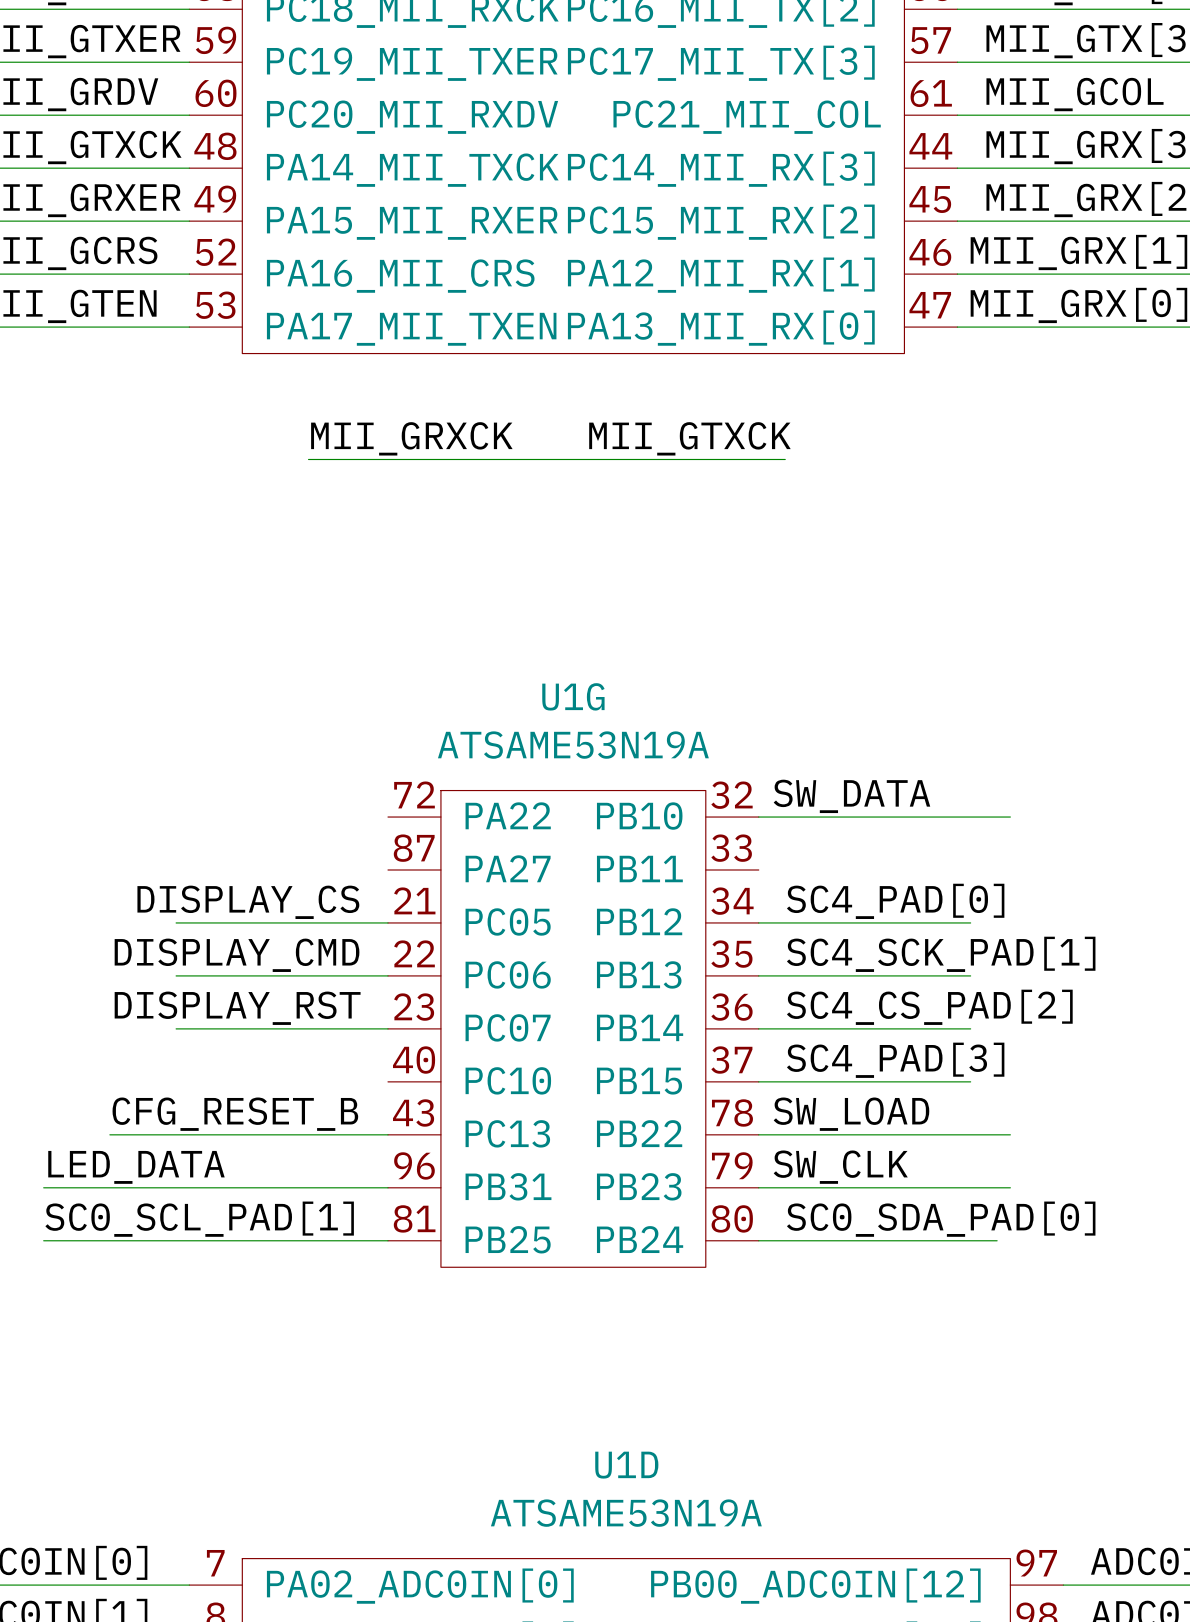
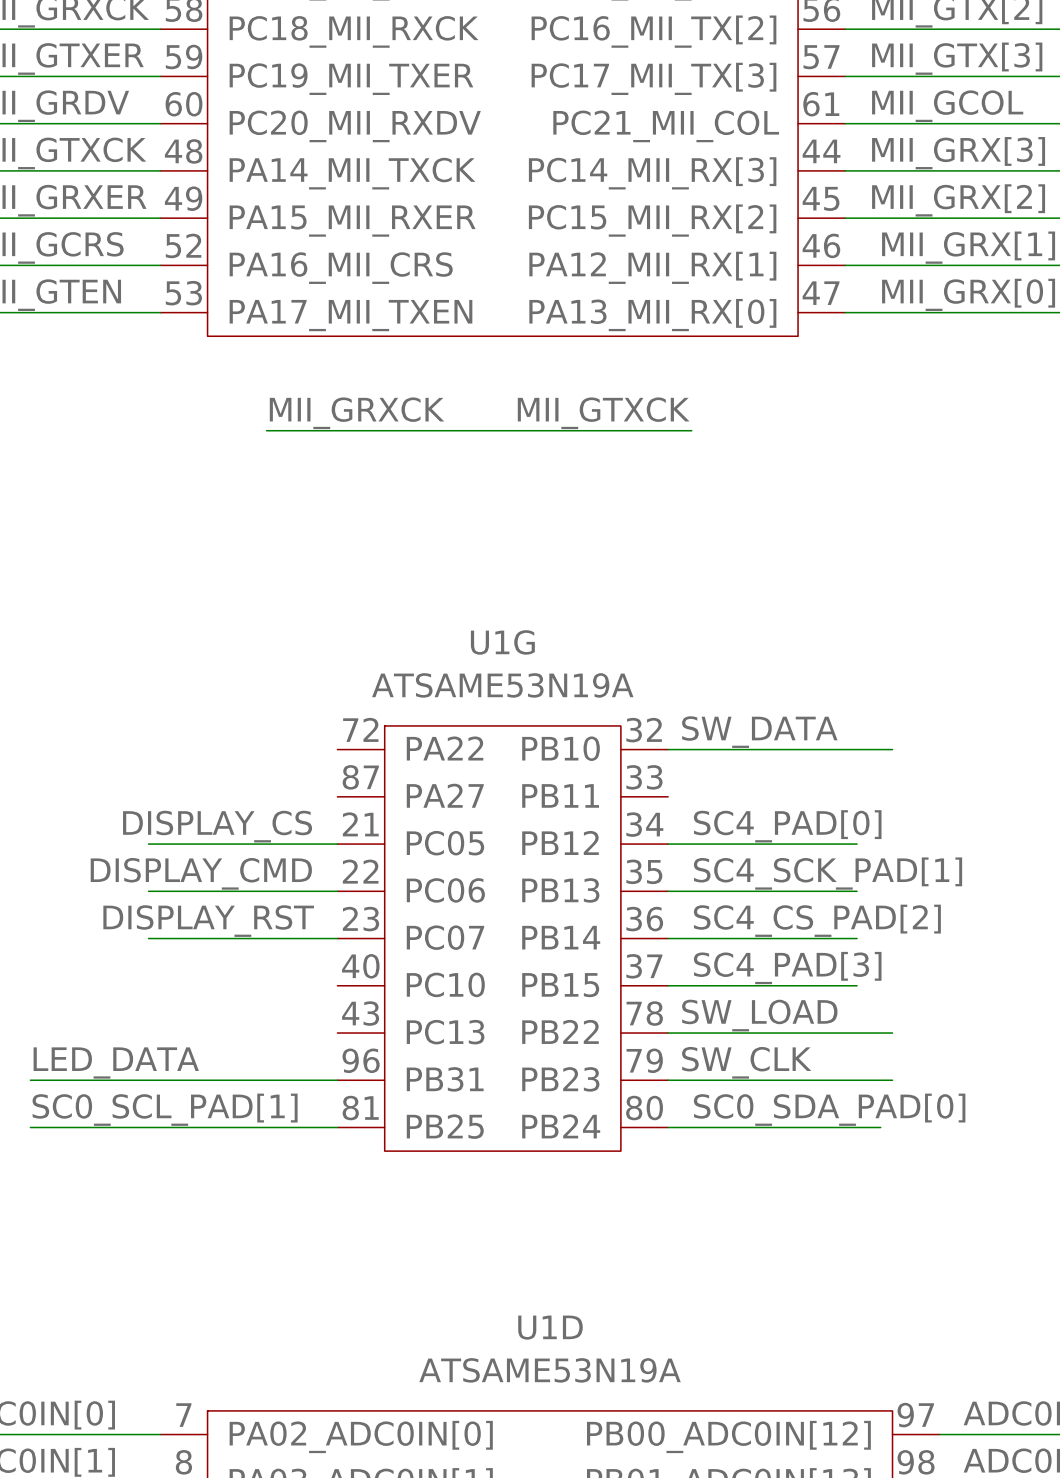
label: CFG_RESET_B (235, 1114) -> none
wire: (109, 1134) (387, 1134) -> none

